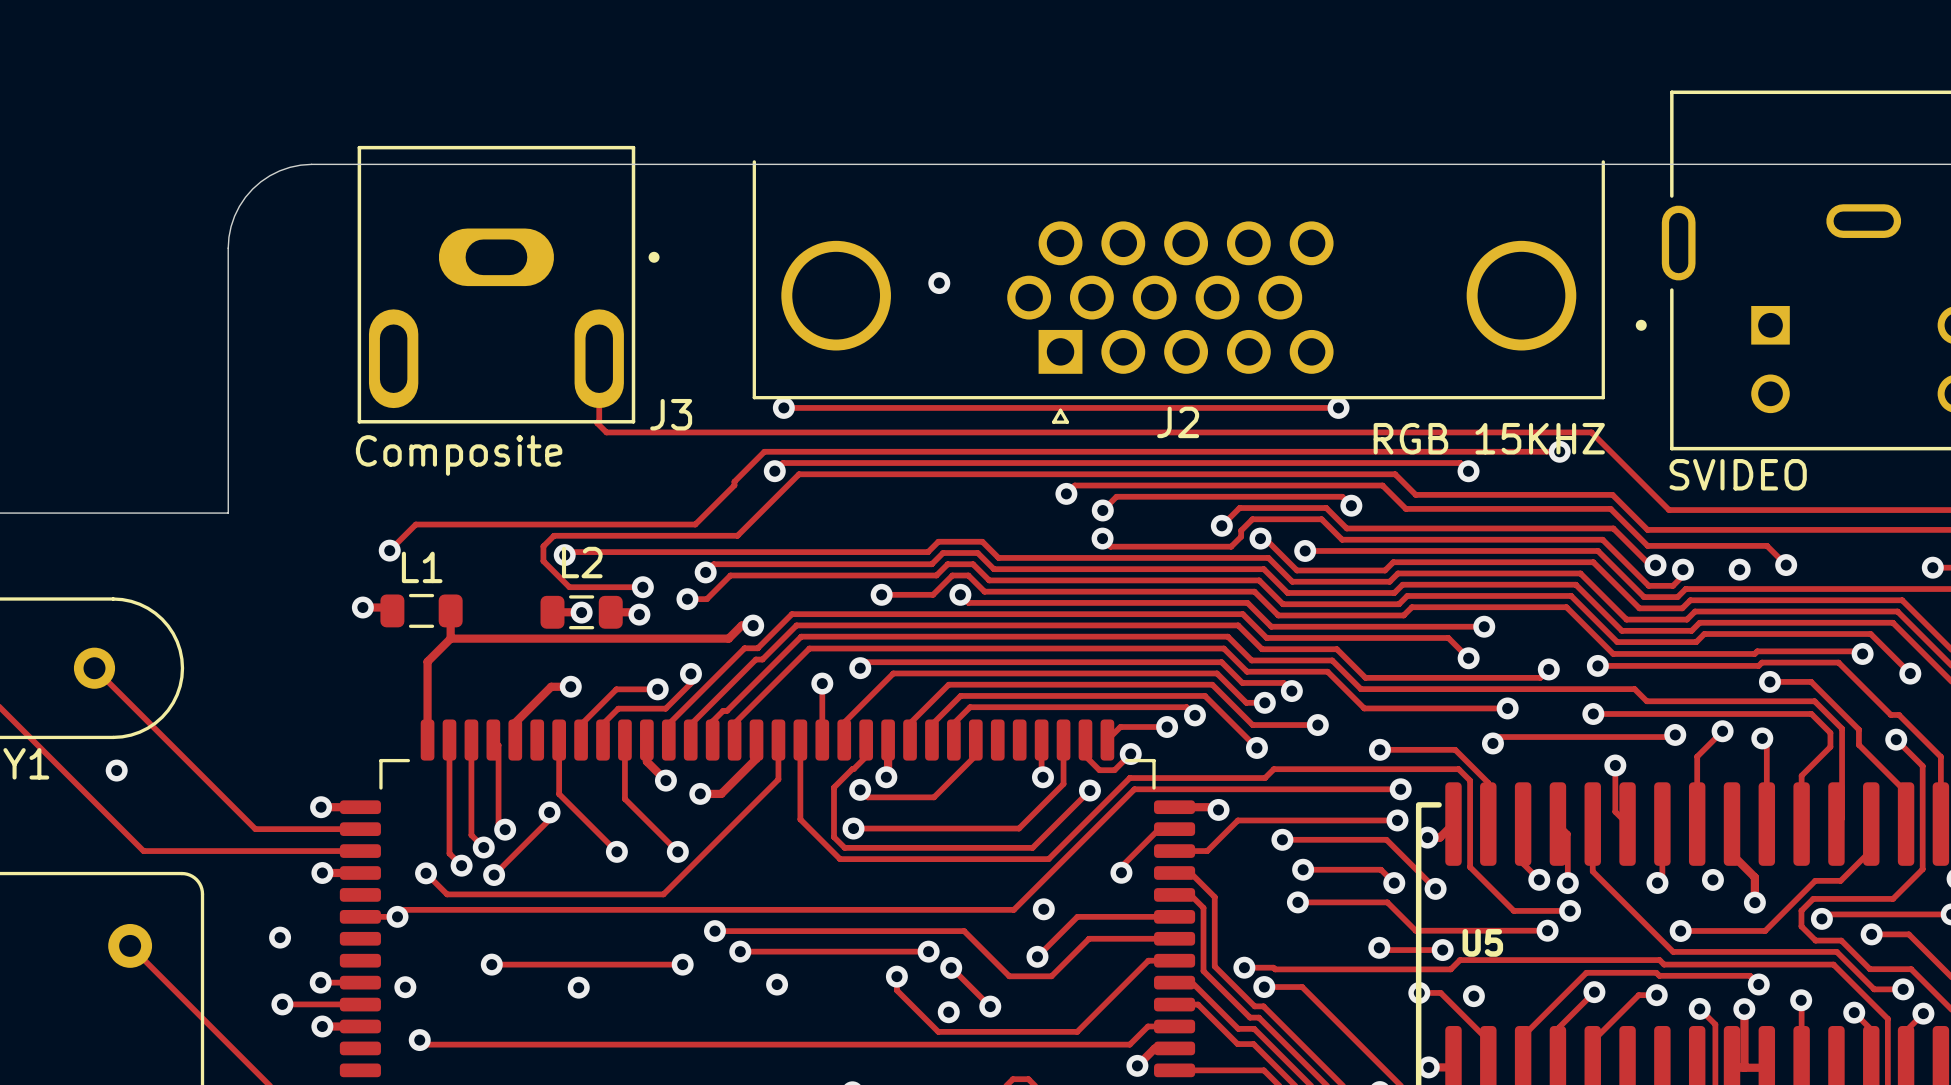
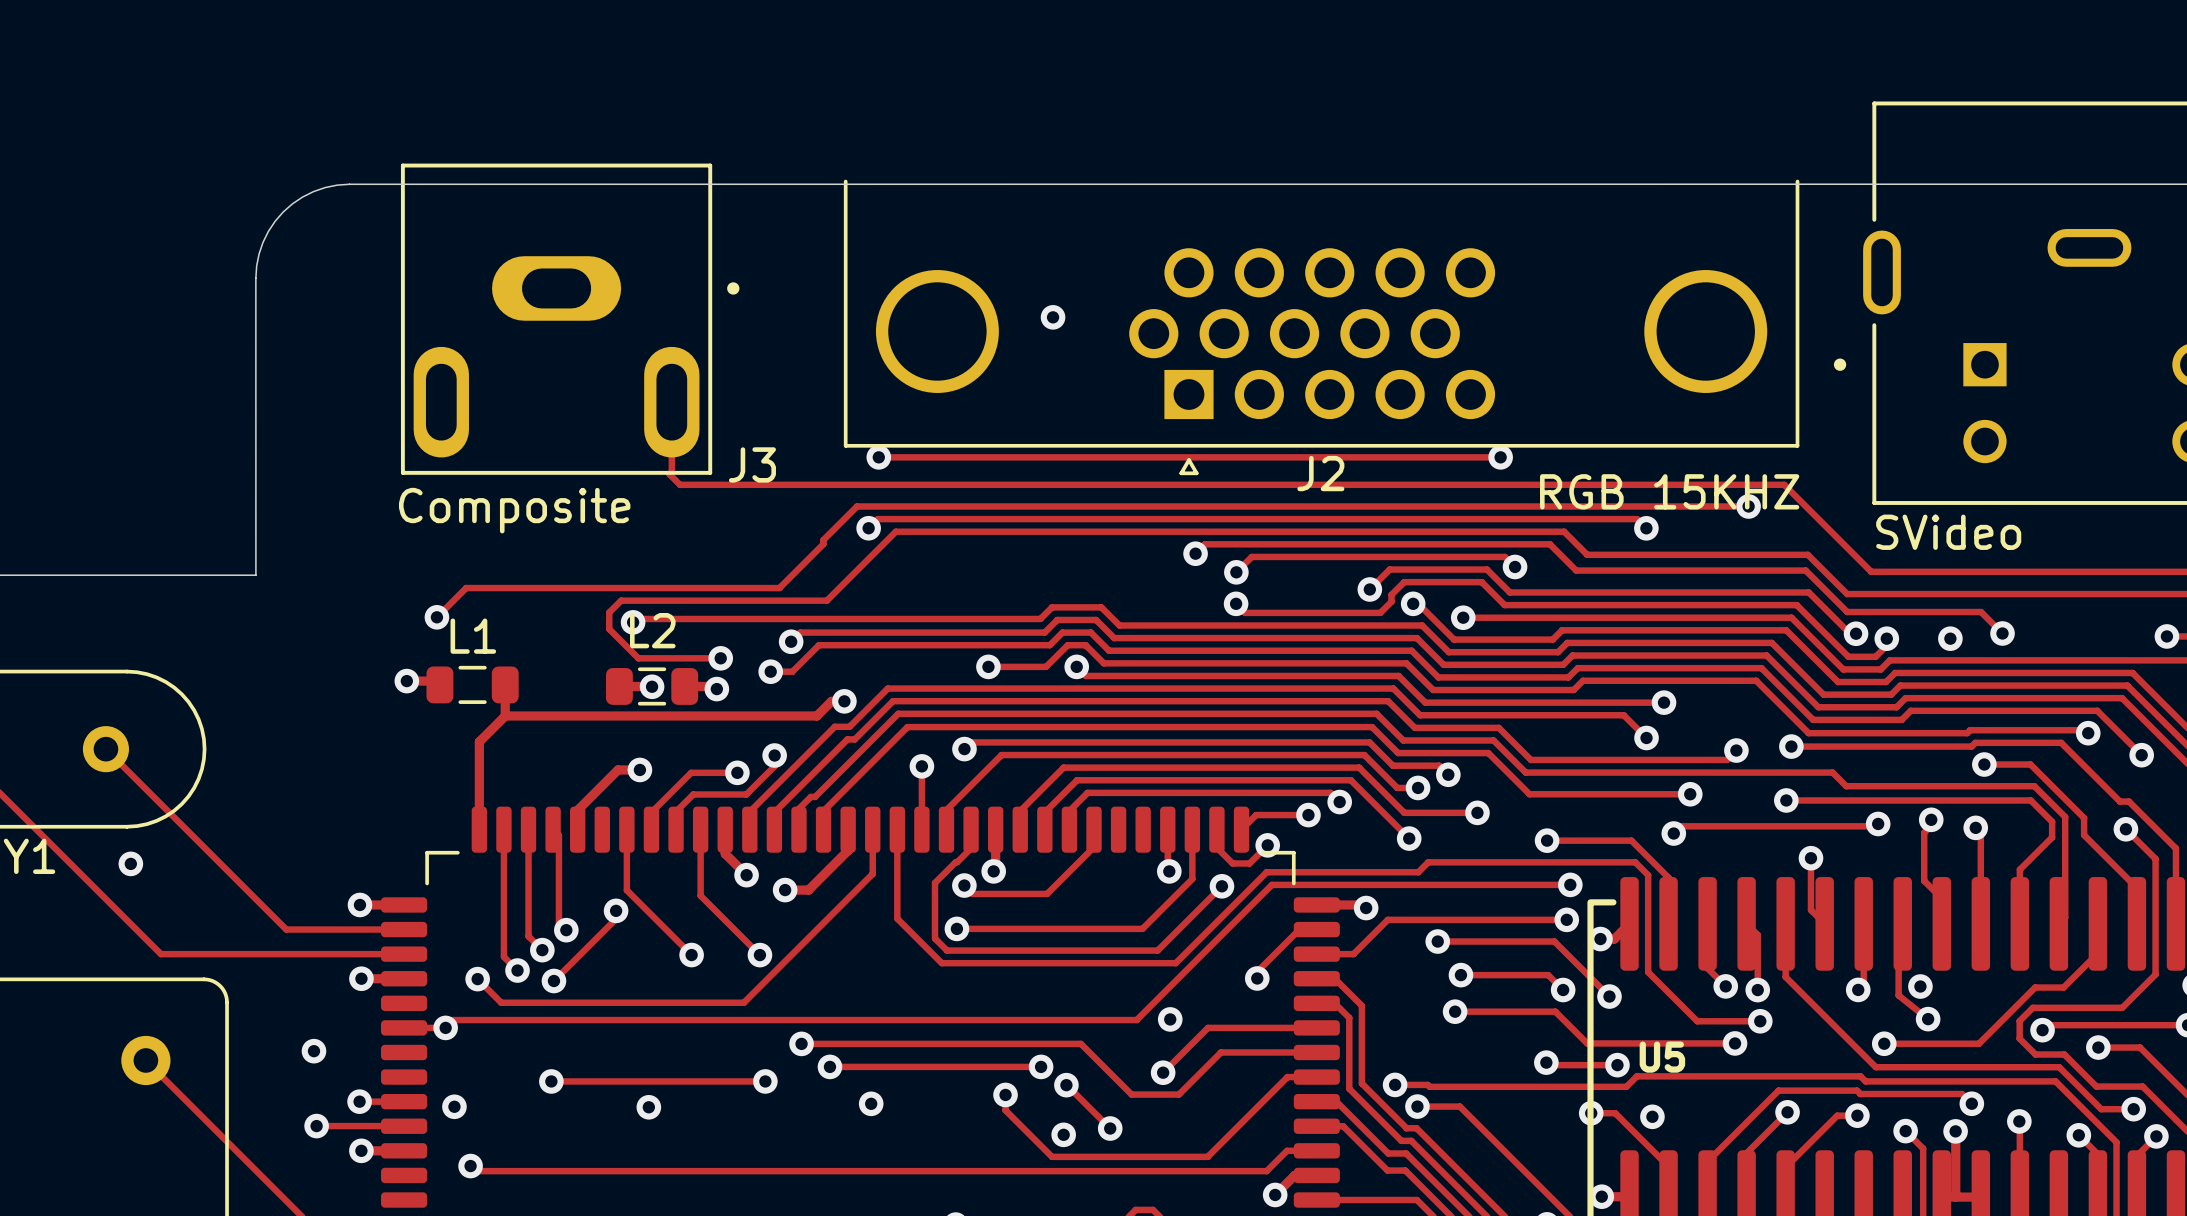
part value: SVIDEO (1738, 474) -> SVideo (1948, 532)
track: (1722, 731) (1697, 756) (1697, 824) -> (1931, 819) (1931, 825) (1924, 832) (1924, 880) (1941, 898) (1941, 923)
track: none -> (1902, 923) (1898, 927) (1898, 995) (1928, 1019)
track: (1732, 824) (1732, 854) (1754, 877) (1754, 902) -> none
via position: (1754, 902) -> (1928, 1019)

